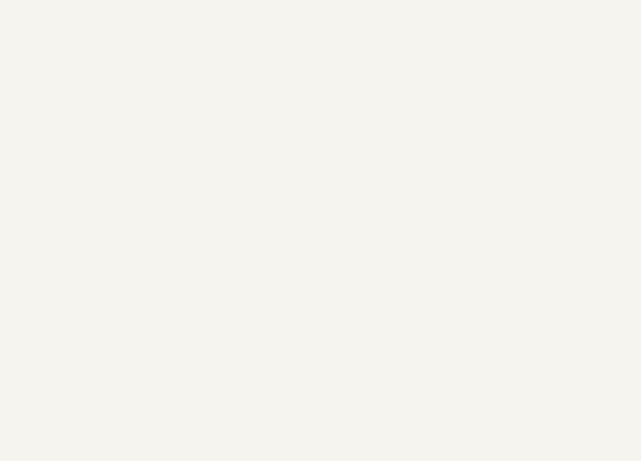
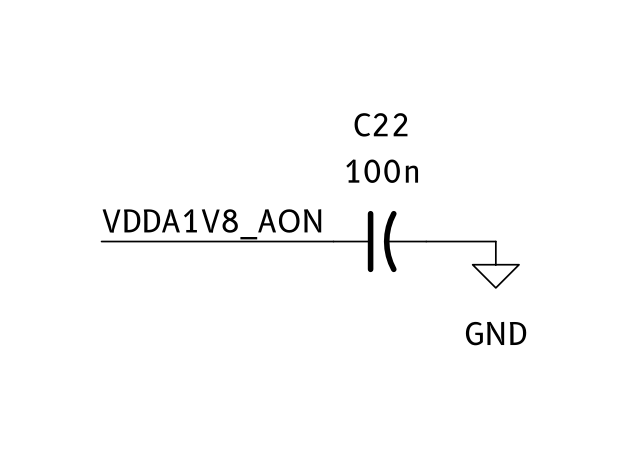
label: none -> VDDA1V8_AON (211, 224)
wire: none -> (101, 241) (333, 241)
C22: none -> 100n (379, 241)
wire: none -> (426, 241) (495, 241)
power symbol: none -> GND (495, 264)

